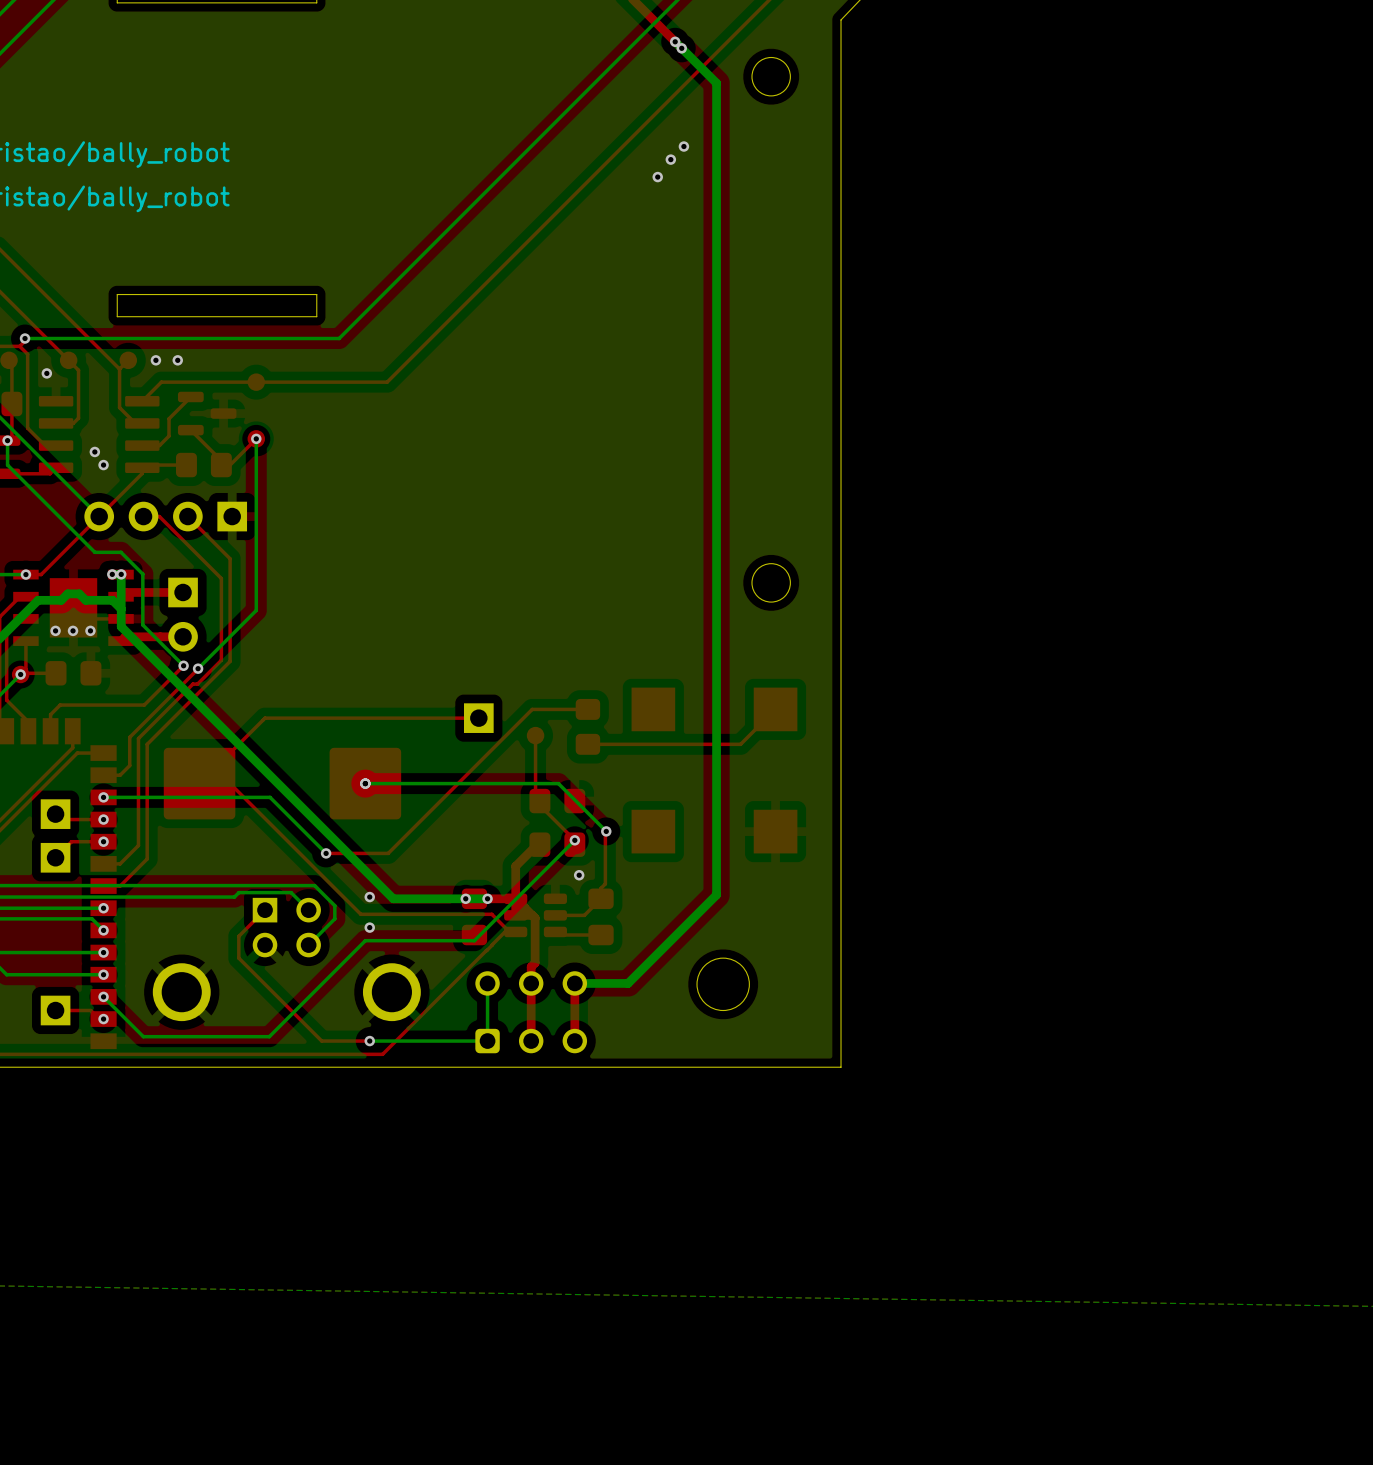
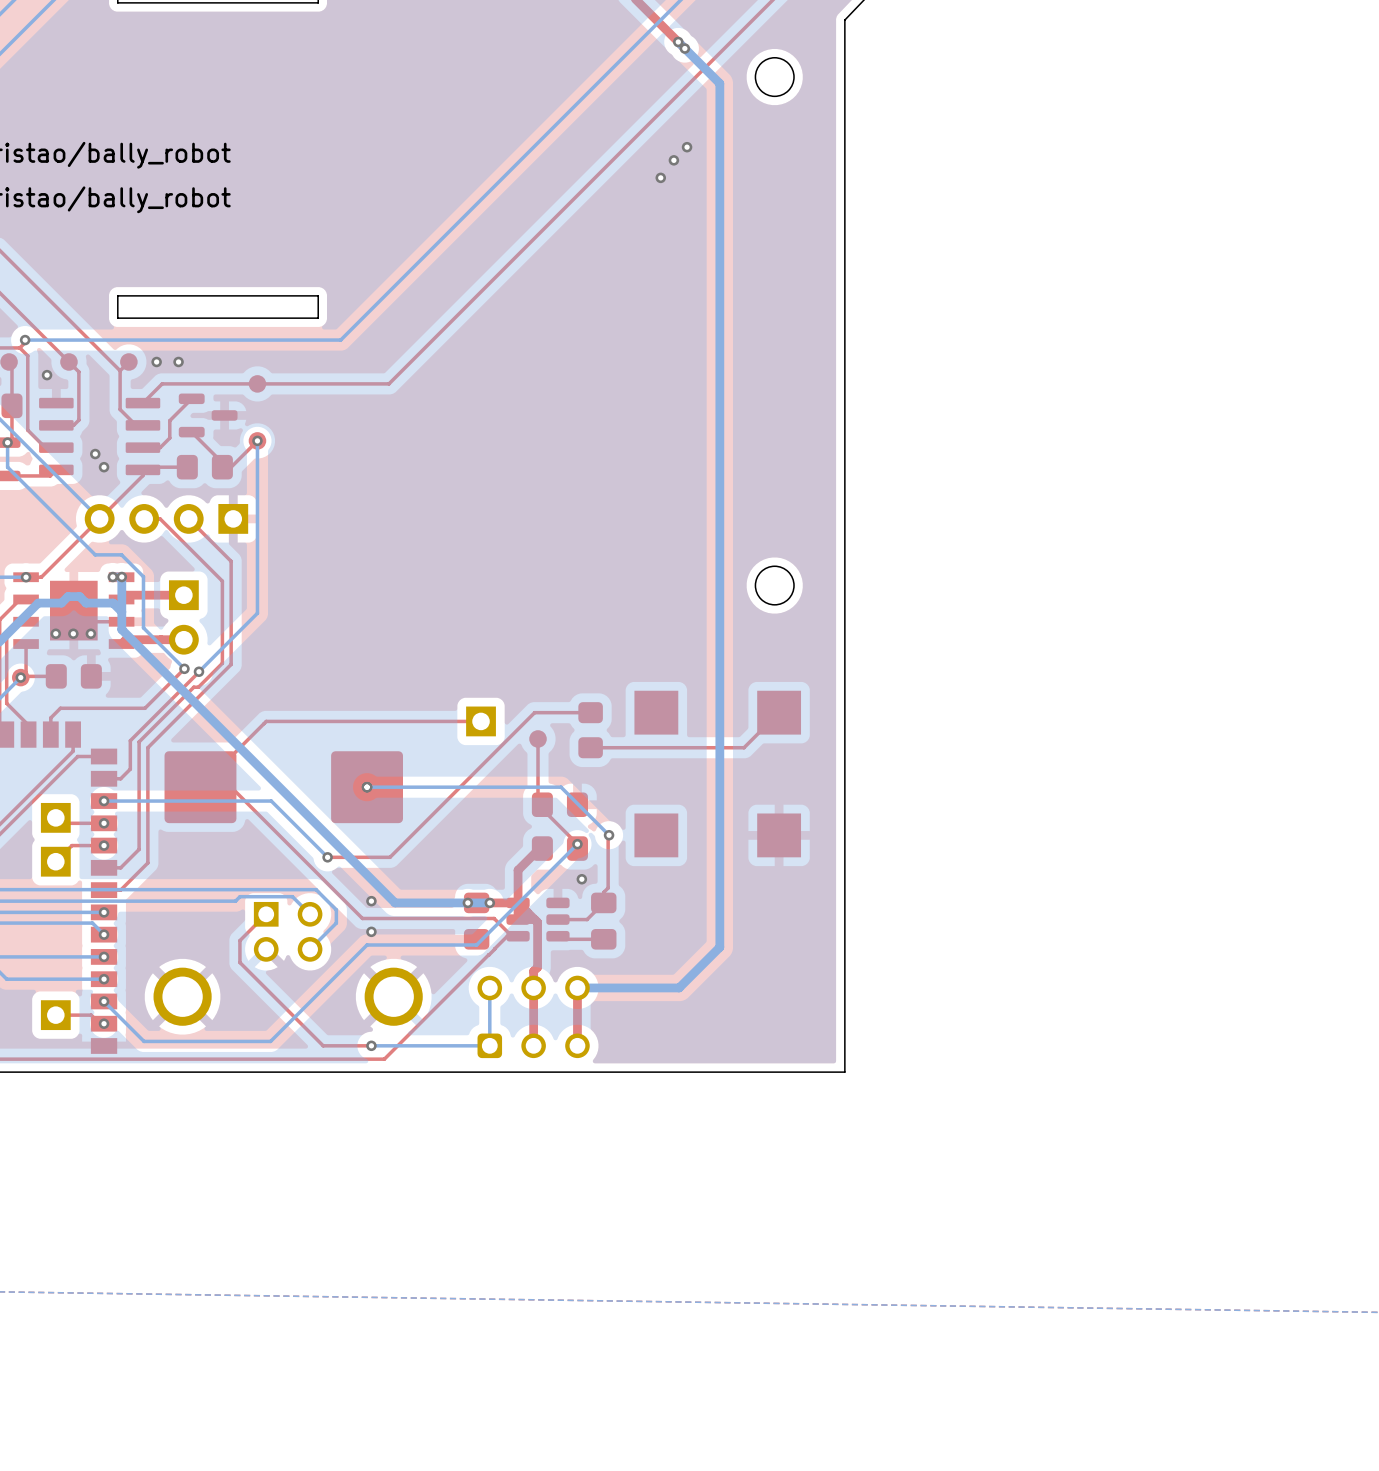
bottom track: (716, 894) (628, 983) -> (719, 899) (719, 947) (679, 987) (630, 987)
round board edge: [696, 957, 750, 1011] -> none

